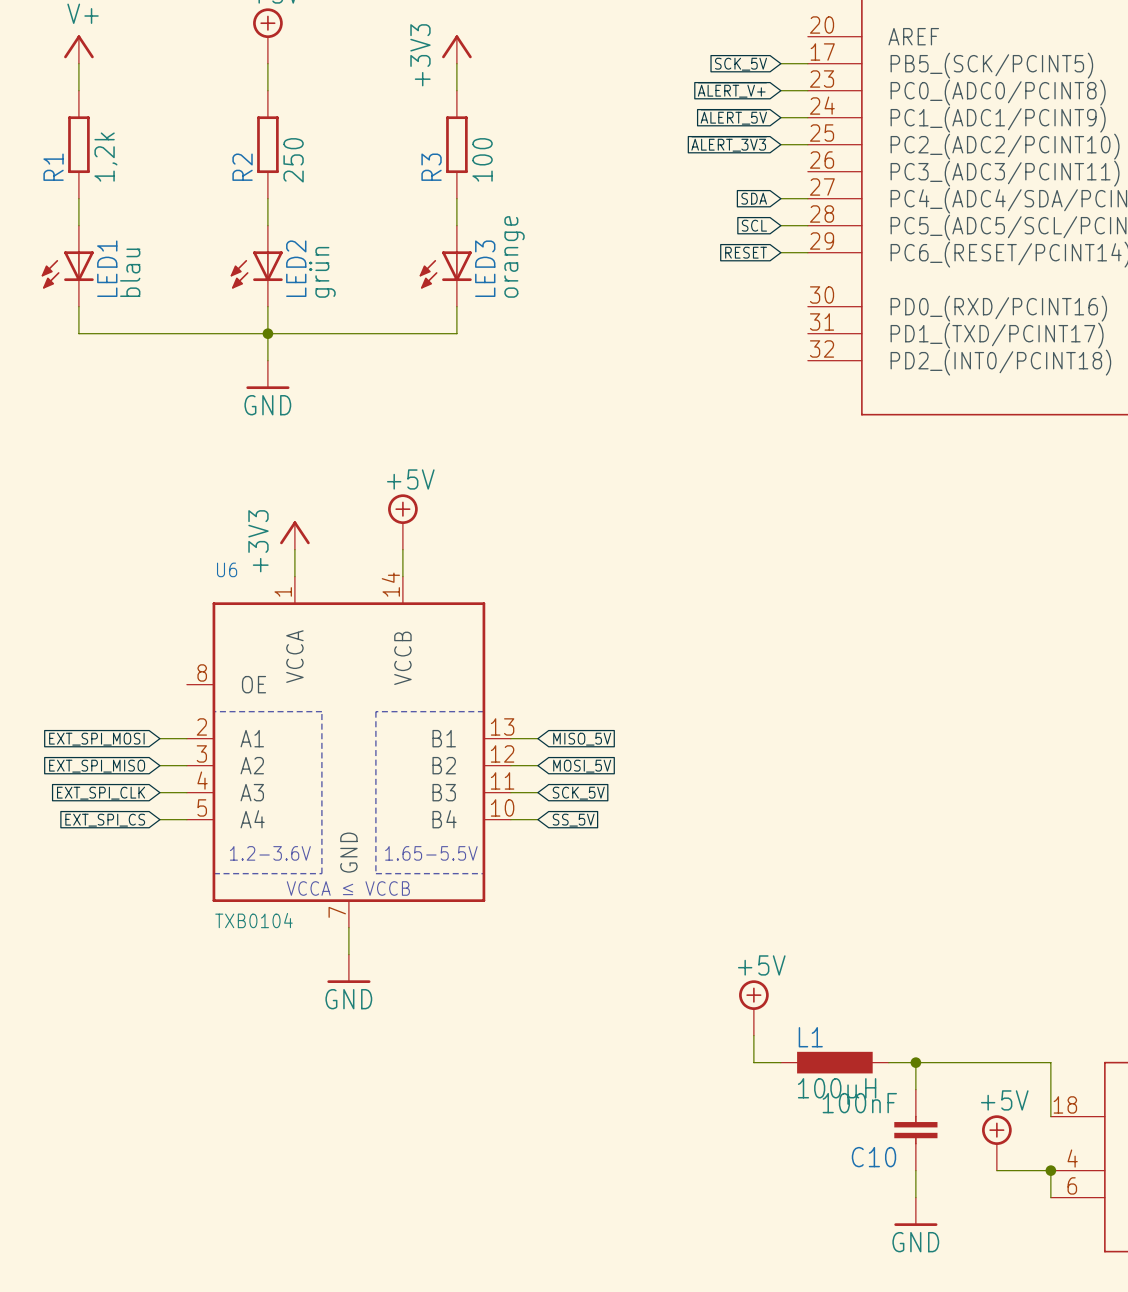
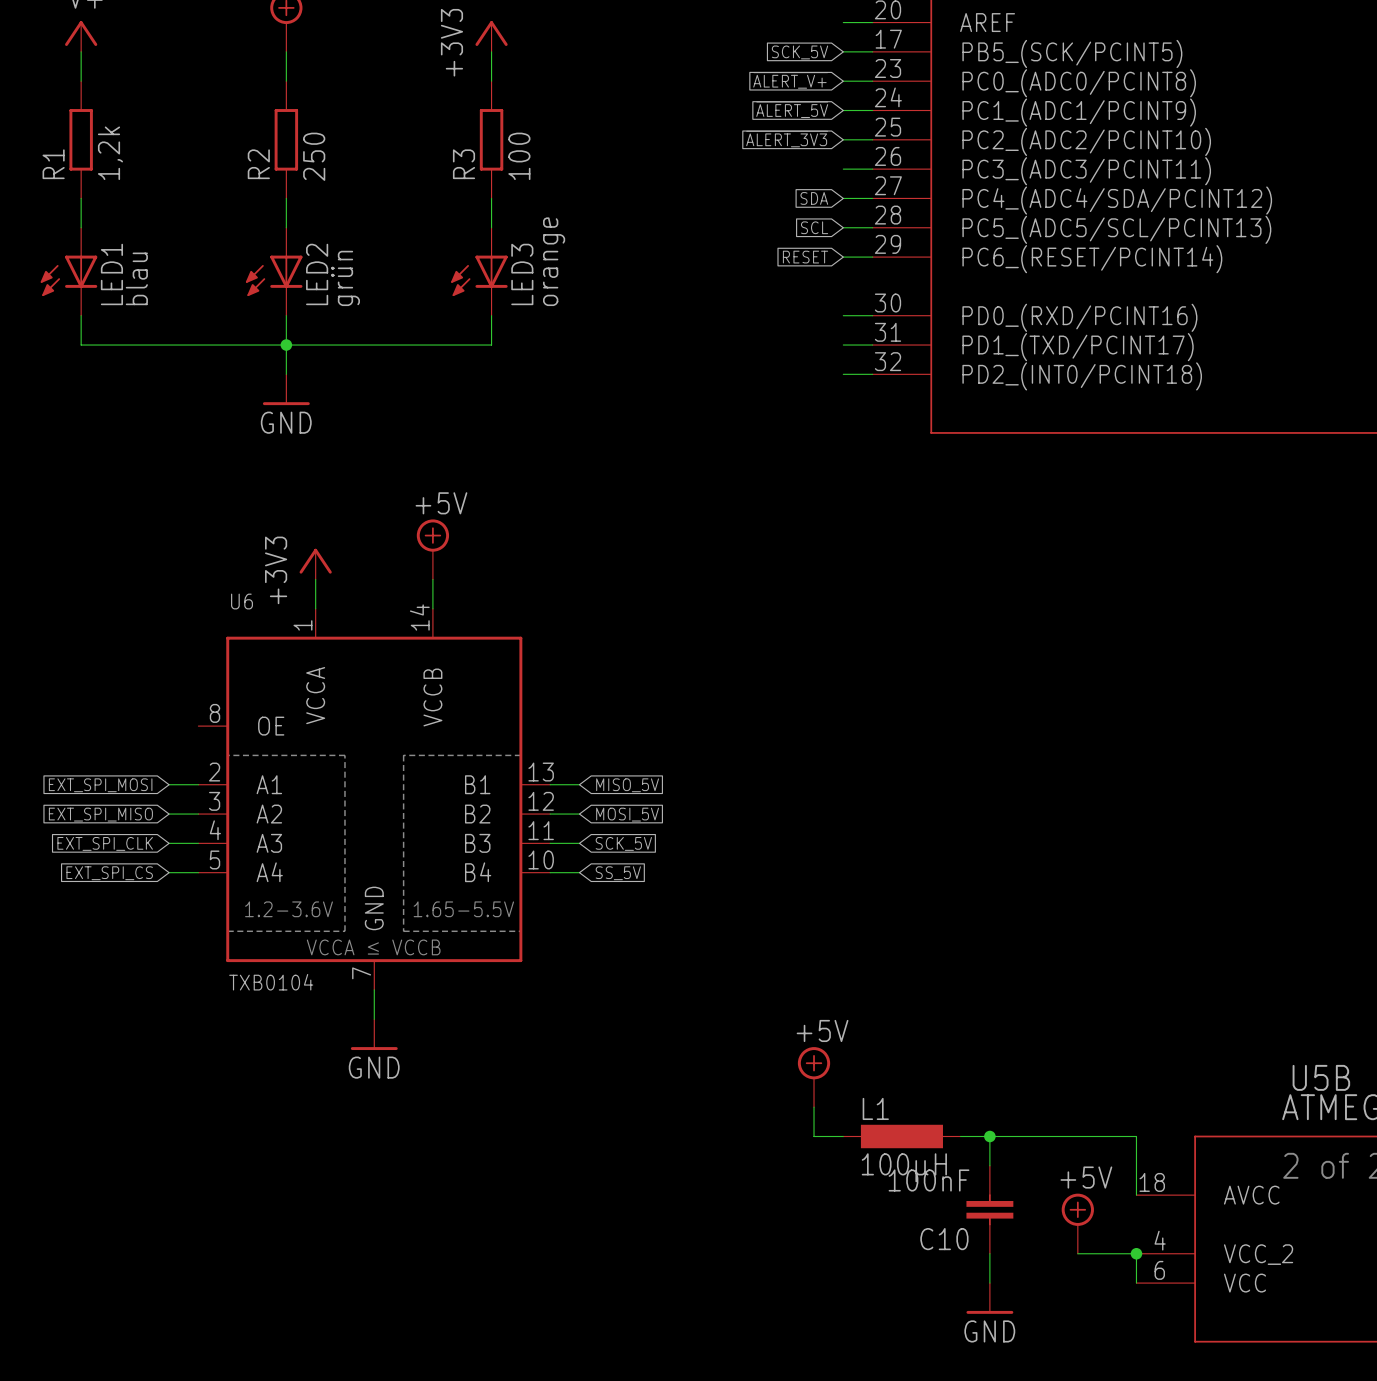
wire: none -> (843, 22) (872, 22)
wire: none -> (843, 169) (872, 169)
wire: none -> (843, 315) (872, 315)
wire: none -> (843, 345) (872, 345)
wire: none -> (843, 374) (872, 374)

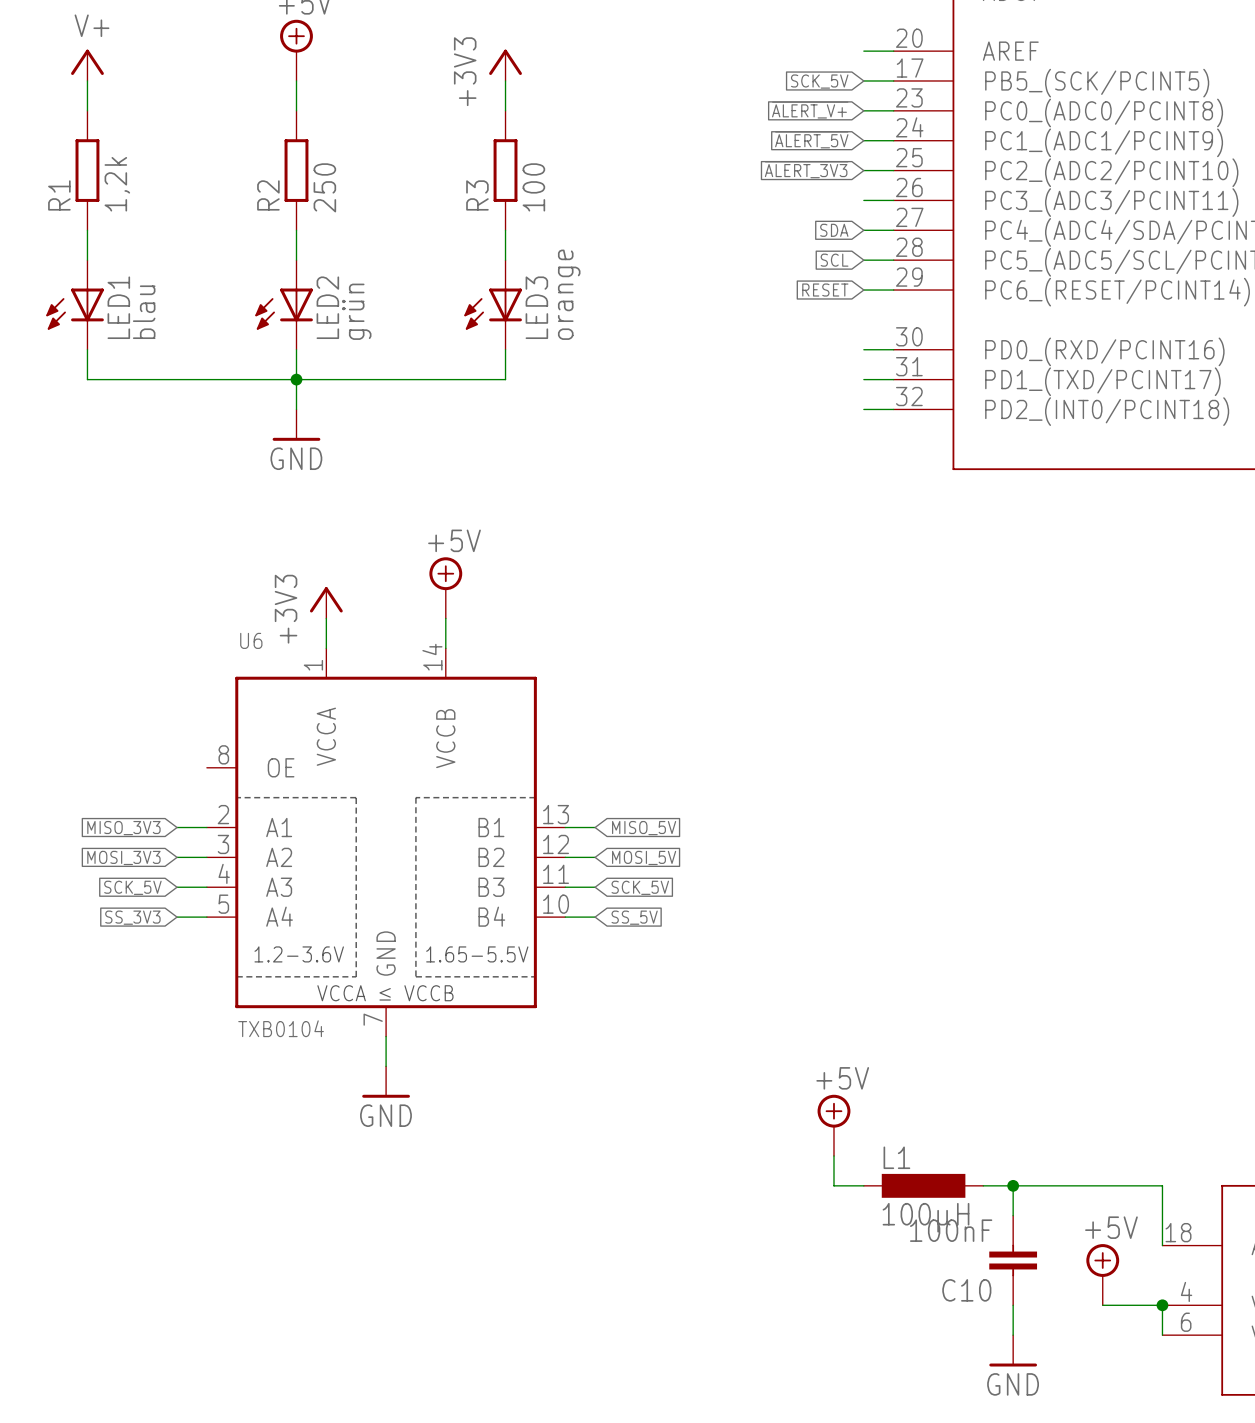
global label: EXT_SPI_MOSI (100, 785) -> MISO_3V3 (123, 828)
global label: EXT_SPI_MISO (100, 814) -> MOSI_3V3 (123, 857)
global label: EXT_SPI_CLK (105, 843) -> SCK_5V (132, 887)
global label: EXT_SPI_CS (109, 873) -> SS_3V3 (132, 917)

